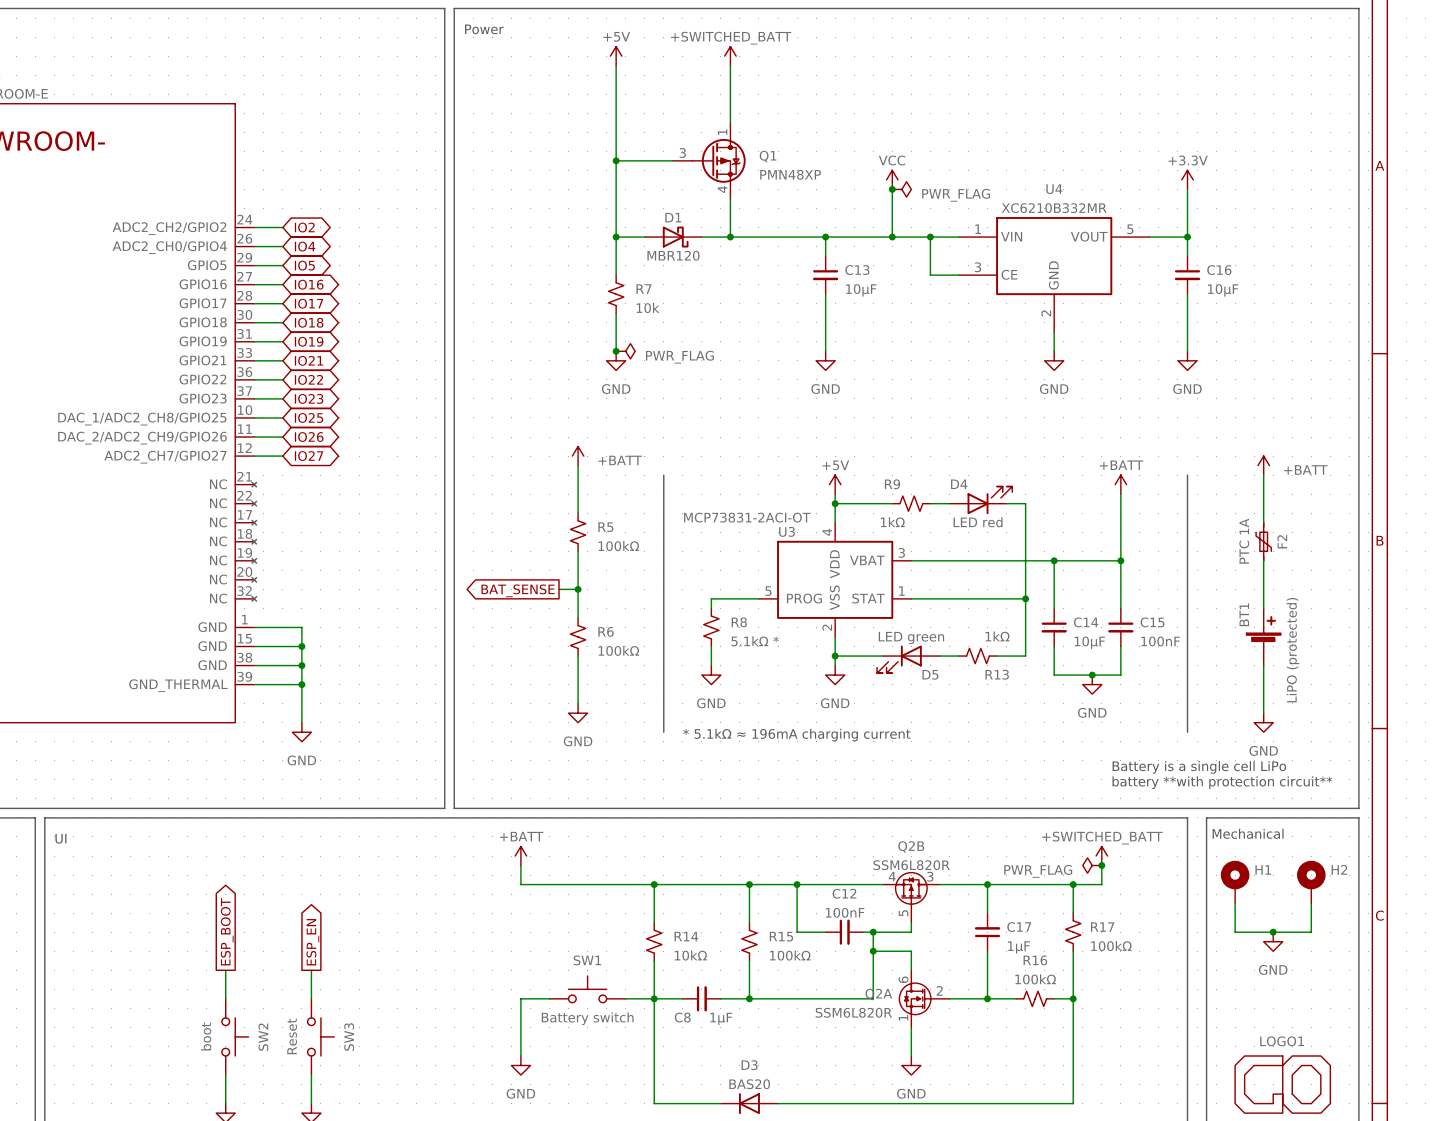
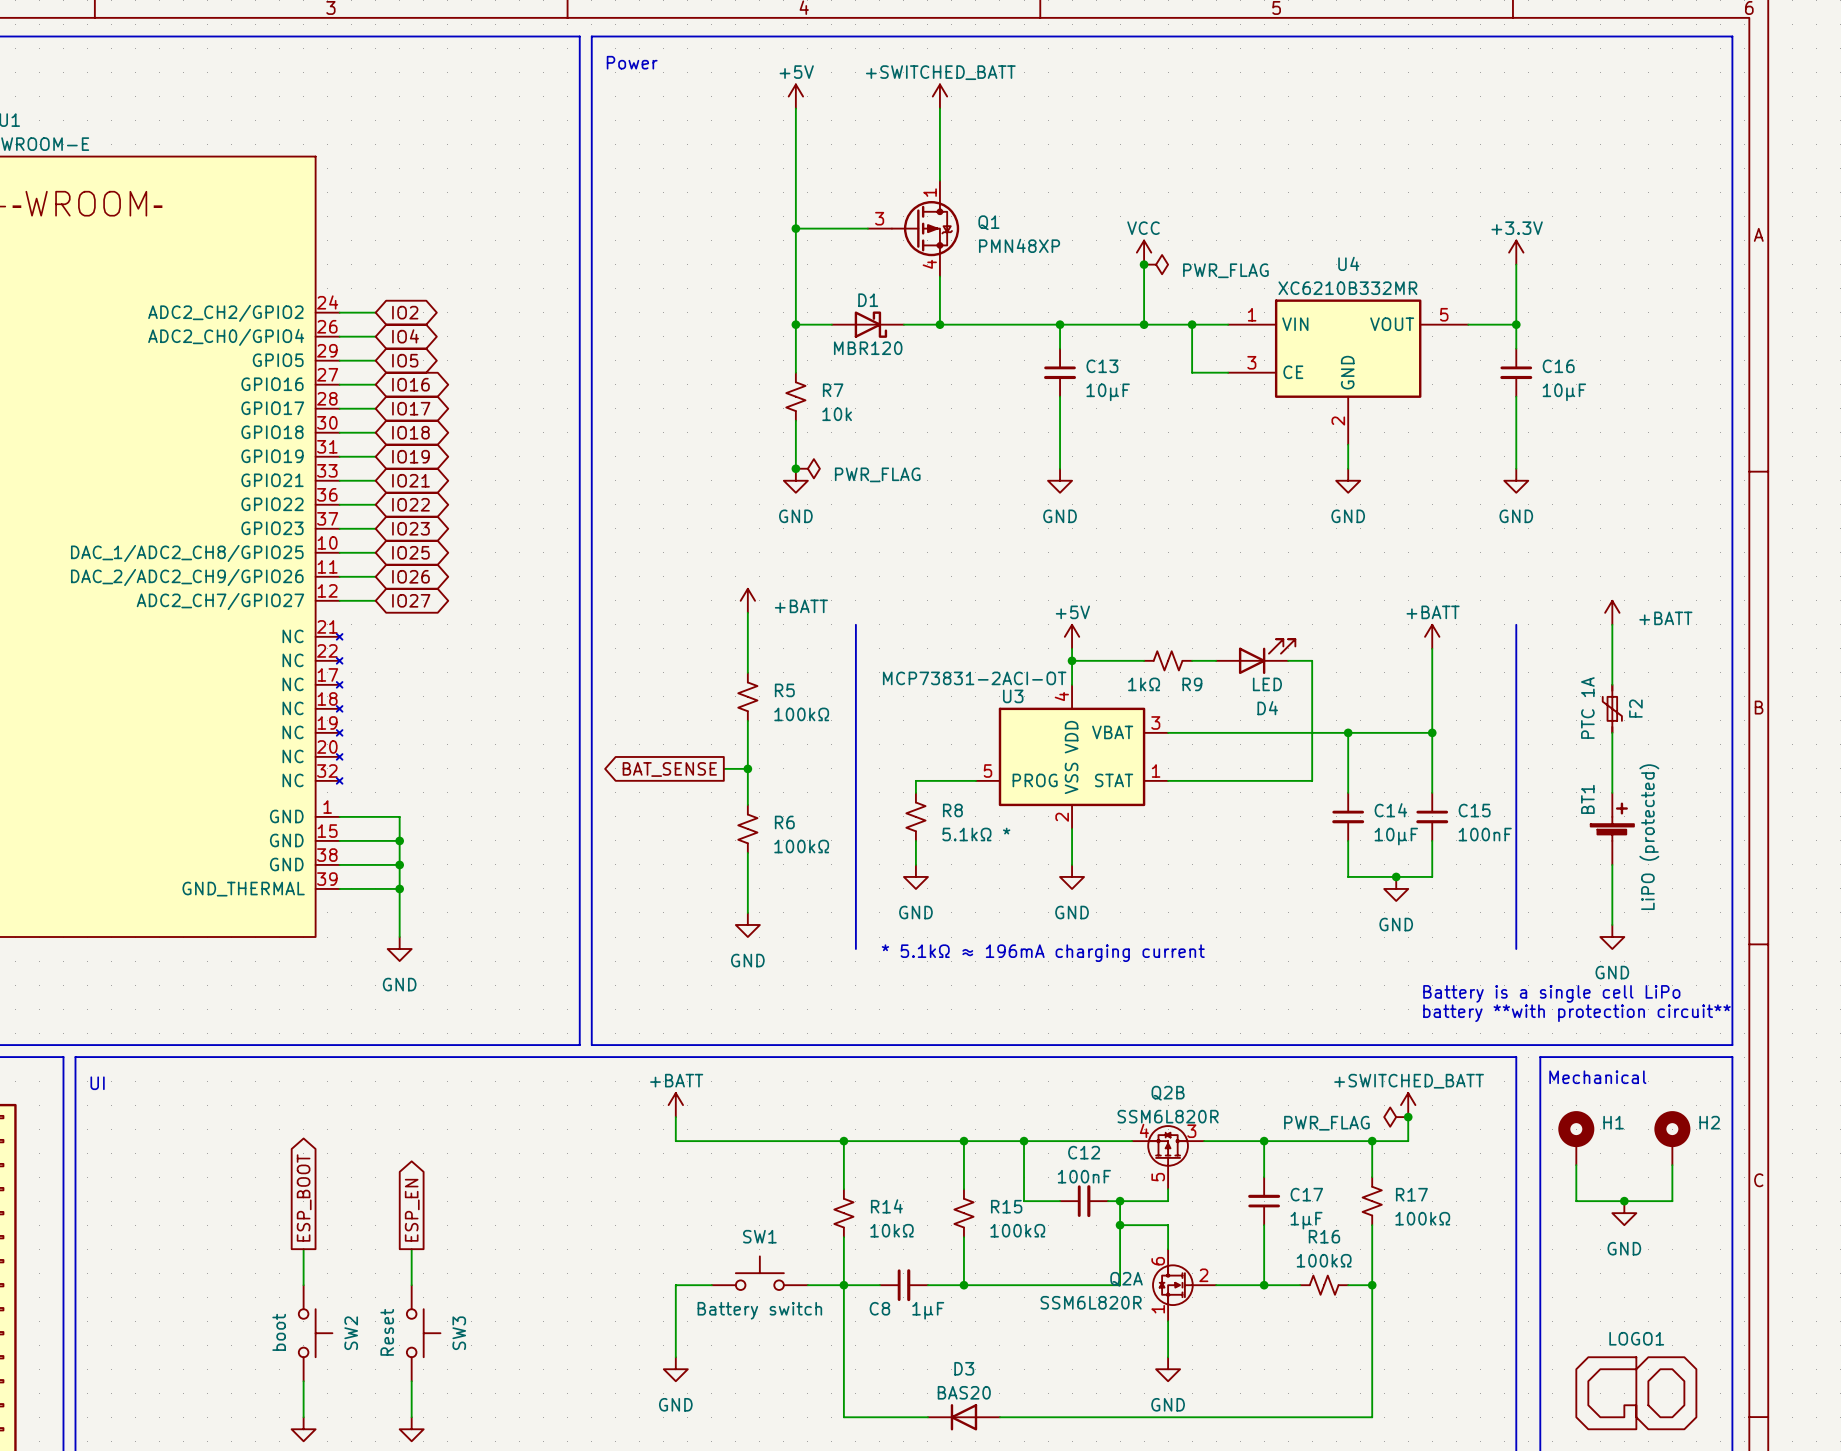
R9 name position: R9 (892, 484) -> R9 (1192, 684)
D4 name position: D4 (959, 484) -> D4 (1267, 708)
D4 value: LED red (978, 522) -> LED (1267, 684)
wire: (1025, 598) (1025, 656) (997, 656) -> none
junction: (1025, 598) -> none
wire: (835, 656) (882, 656) -> none
junction: (835, 656) -> none
wire: (939, 656) (958, 656) -> none
R13: 1kΩ (978, 656) -> none
D5: LED green (908, 659) -> none

